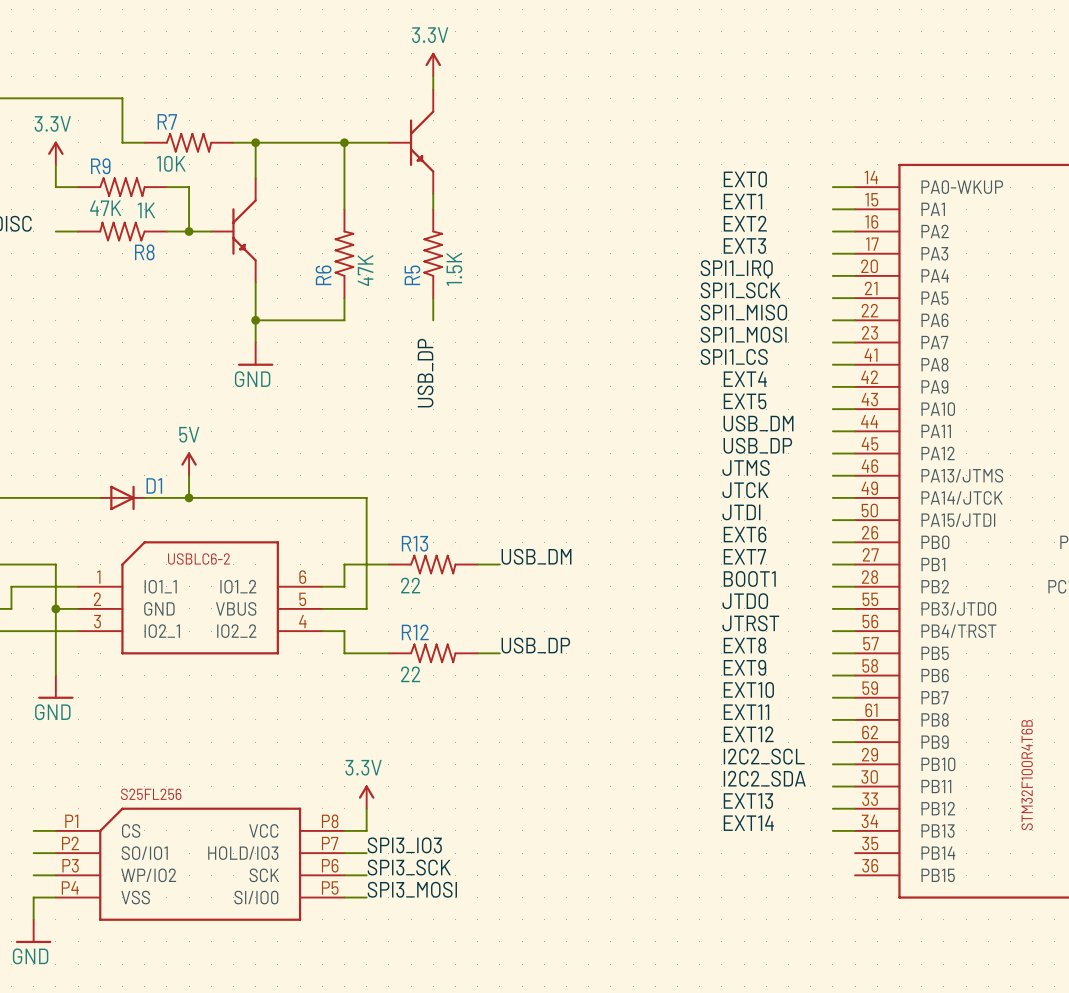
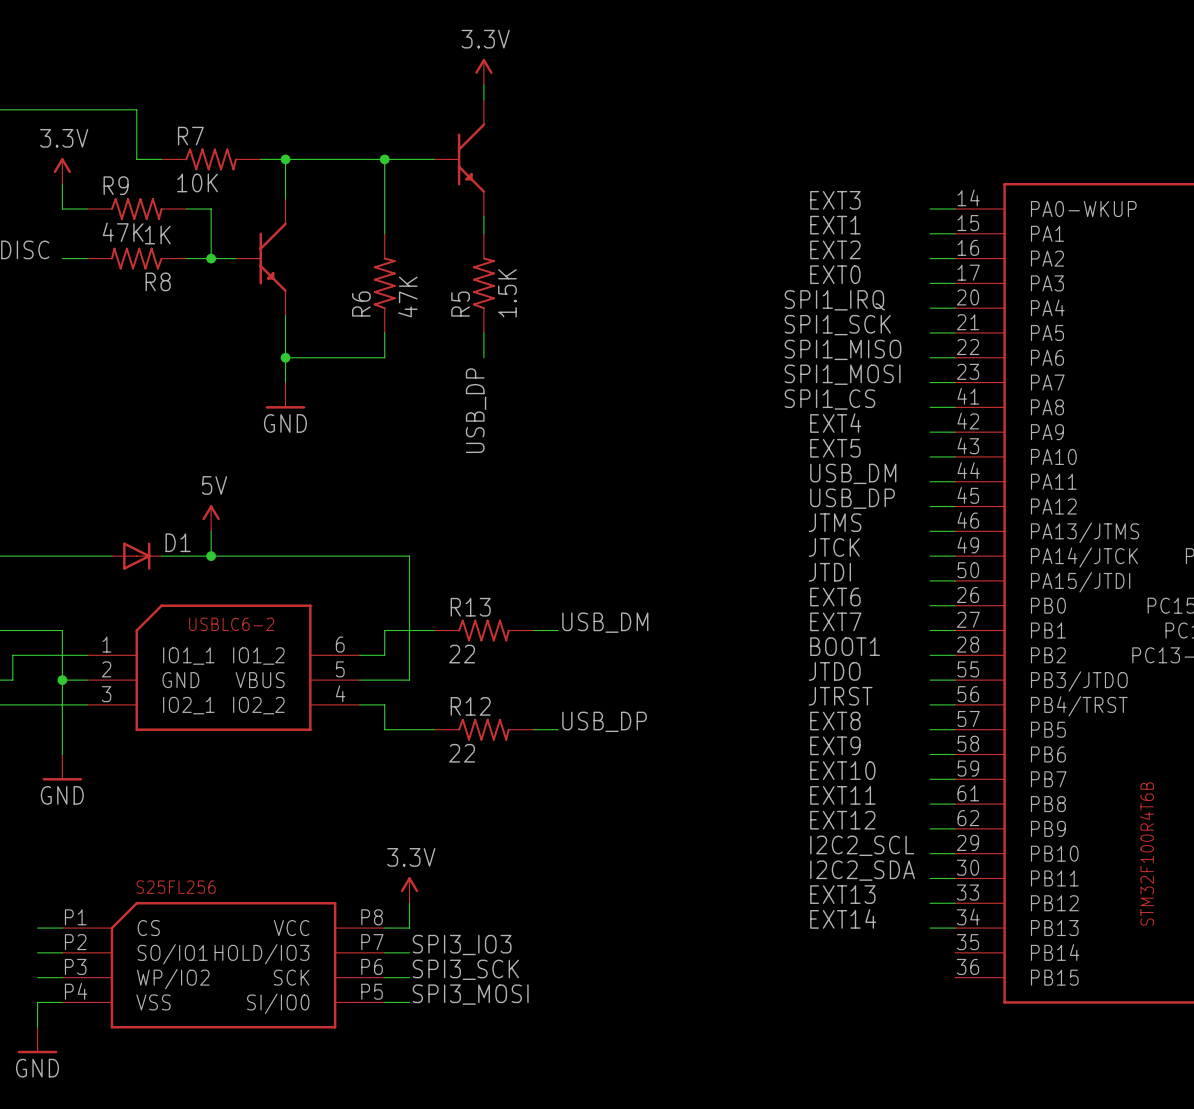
label: EXT0 (745, 179) -> EXT3 (835, 200)
label: EXT3 (744, 246) -> EXT0 (835, 274)

